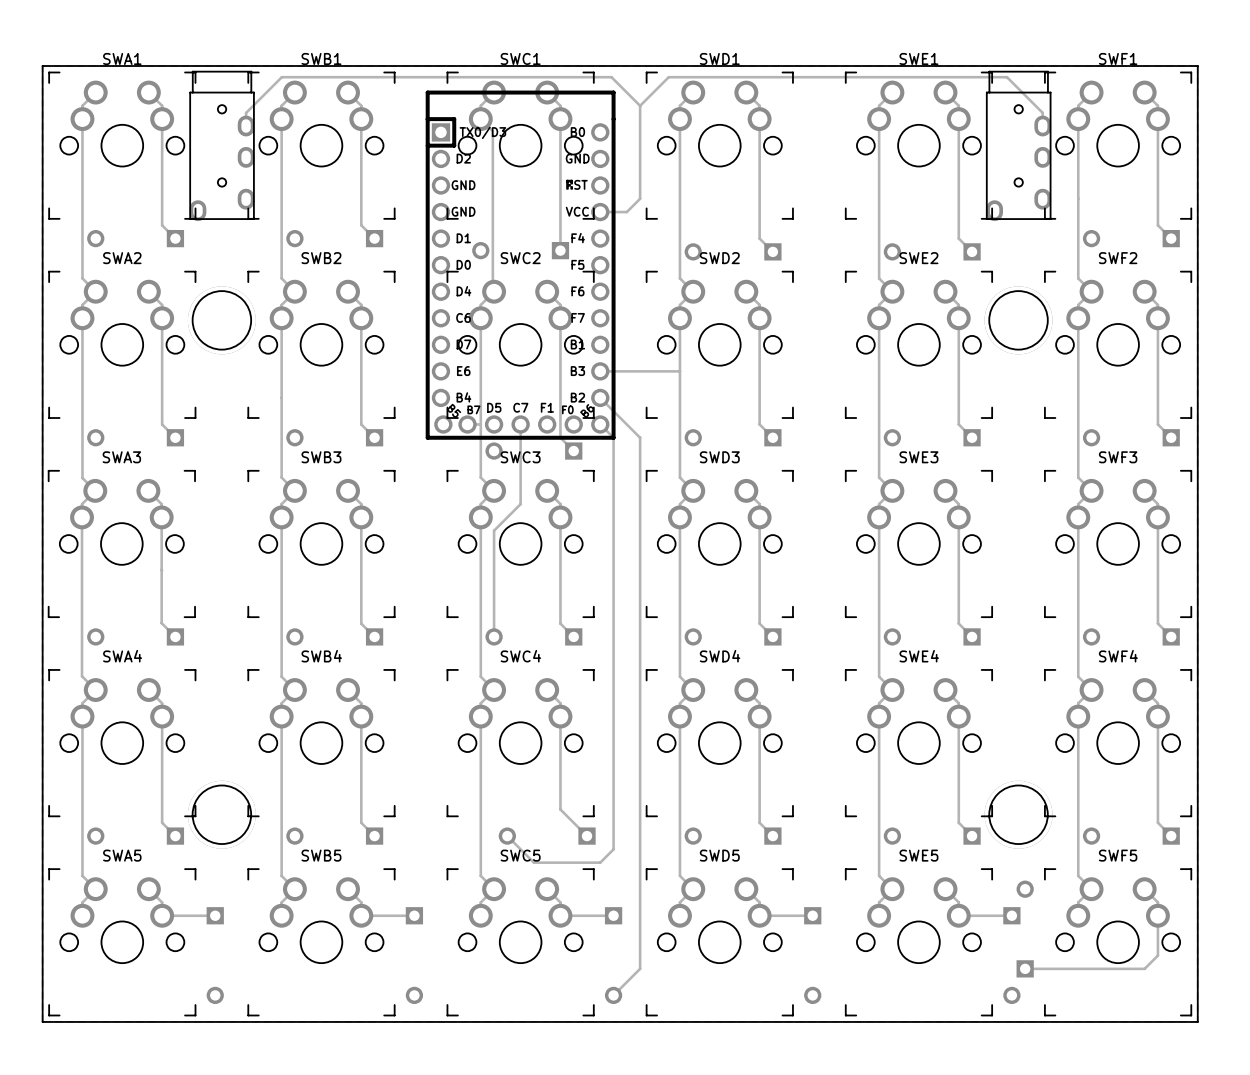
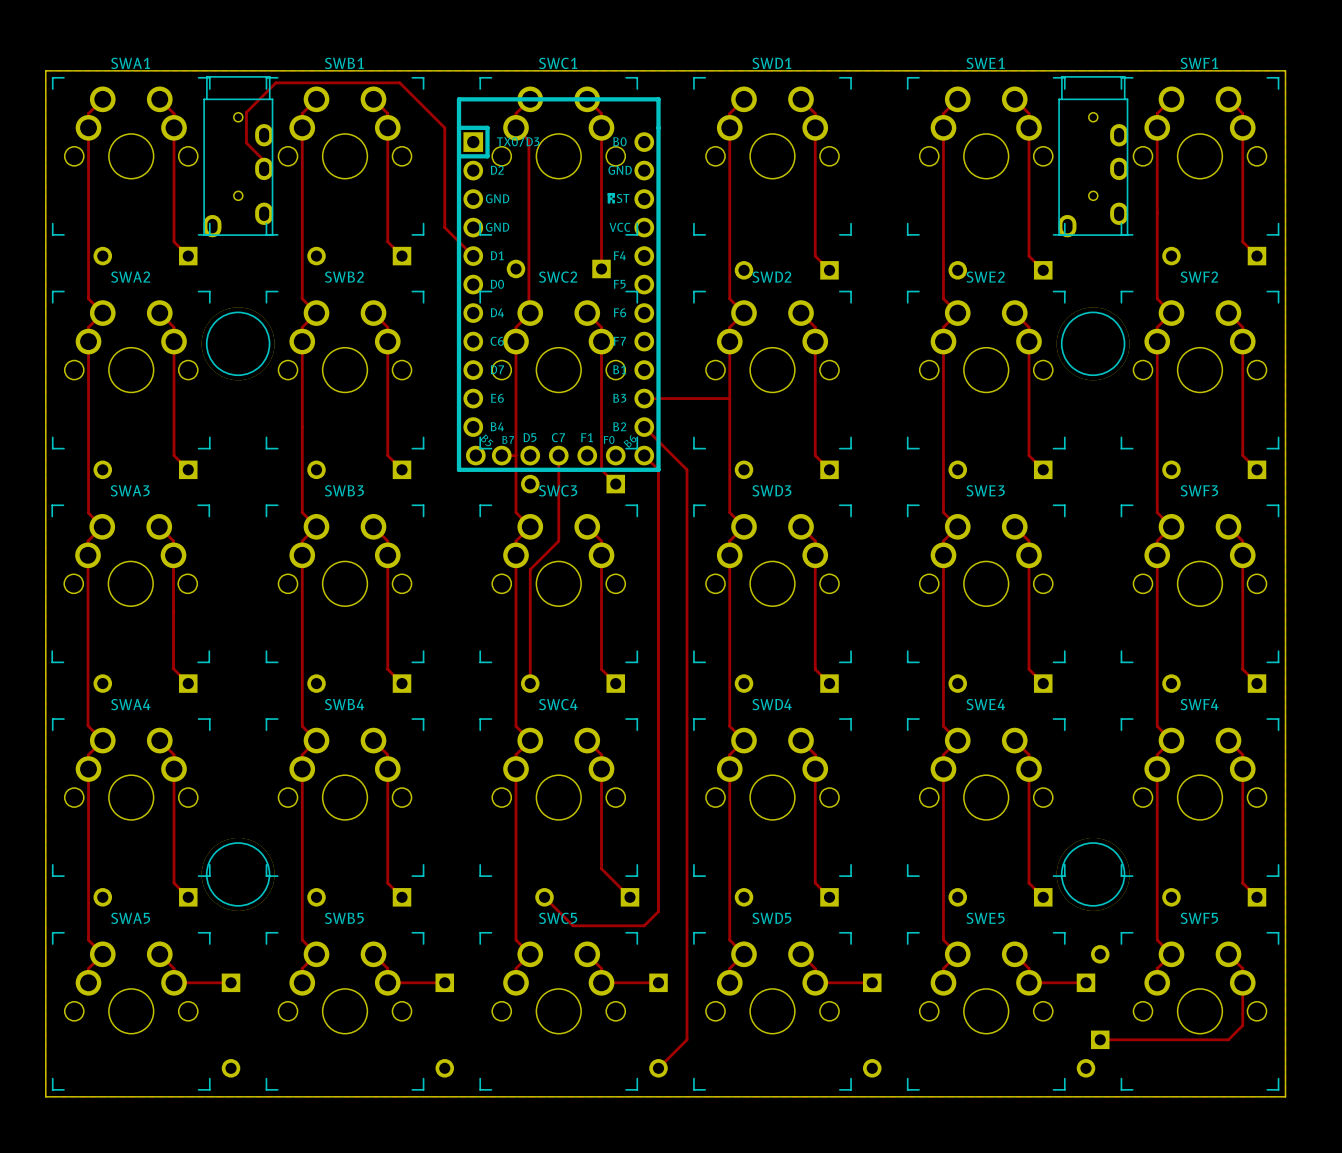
track: (281, 77) (246, 112) (246, 126) -> (302, 82) (275, 82) (246, 112) (246, 143) (264, 160) (264, 168)
track: (372, 77) (611, 77) (640, 105) -> (399, 82) (444, 127) (444, 227) (473, 256)
track: (640, 105) (668, 77) (1007, 77) (1042, 112) (1042, 126) -> none
track: (640, 105) (640, 198) (626, 212) (600, 212) -> none

